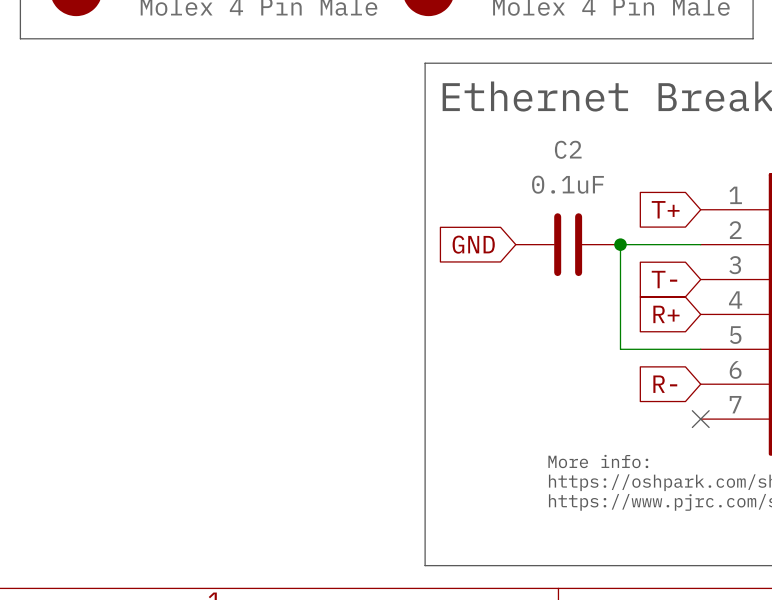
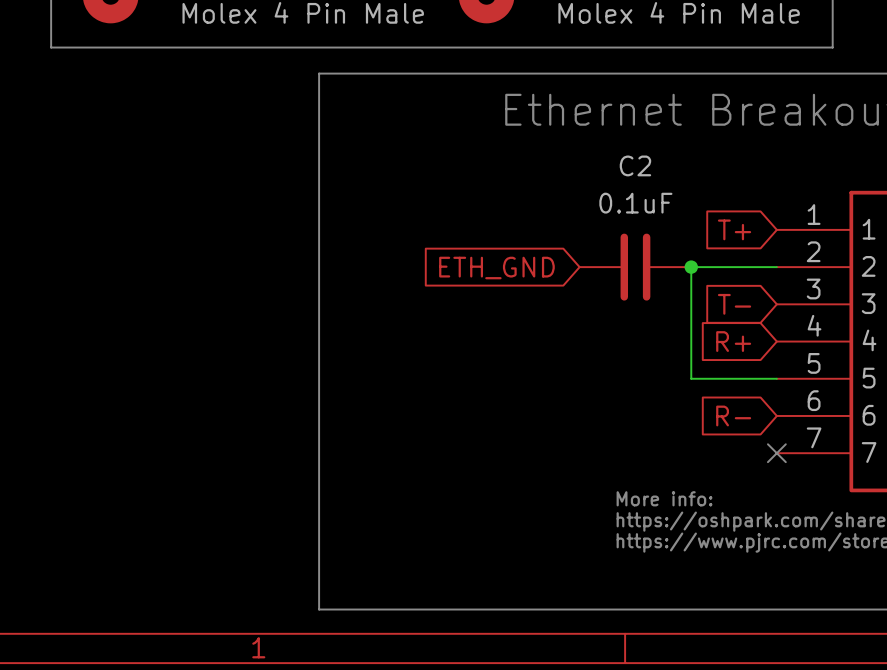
line: (425, 63) (425, 565) -> (482, 73) (319, 73) (319, 609) (482, 609)
global label: GND (473, 244) -> ETH_GND (496, 268)

